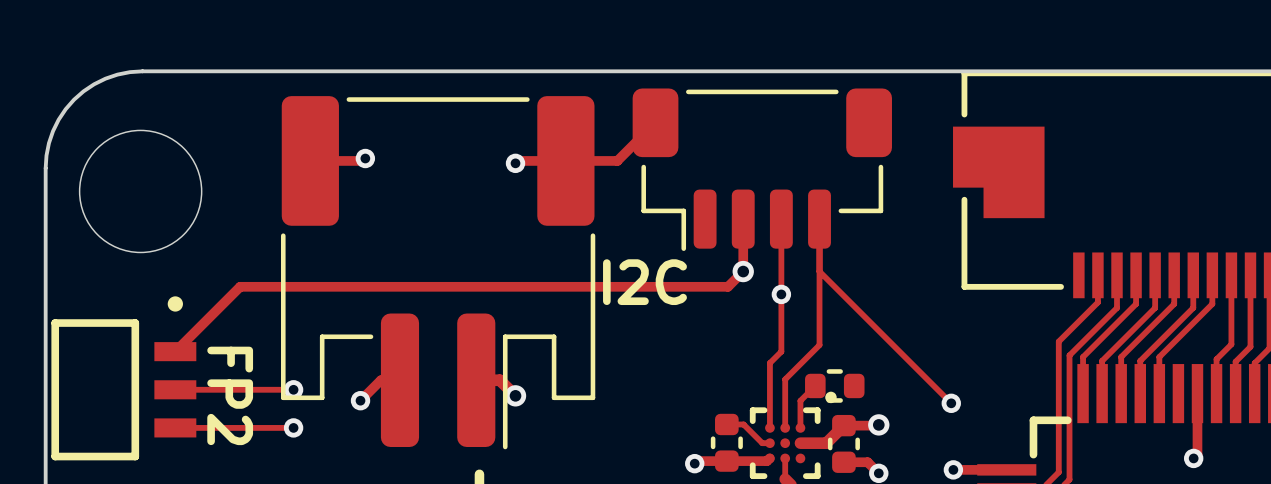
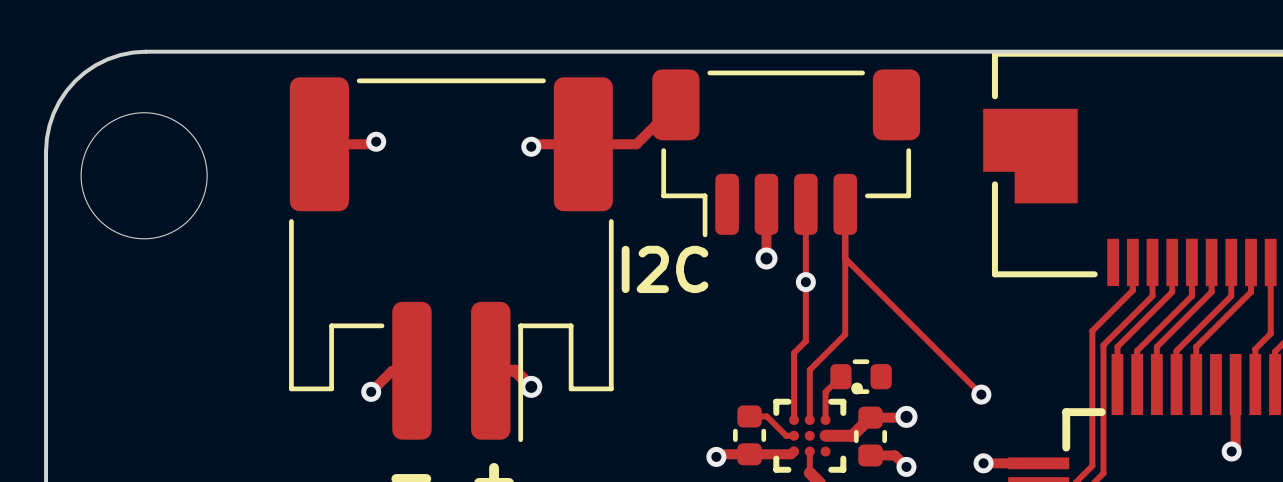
track: (743, 271) (727, 286) (240, 286) (175, 351) -> none
part: (123, 378) -> none
track: (175, 389) (293, 389) -> none
via: (293, 389) -> none
text: FP2 (230, 395) -> none
track: (175, 427) (293, 427) -> none
via: (293, 427) -> none

